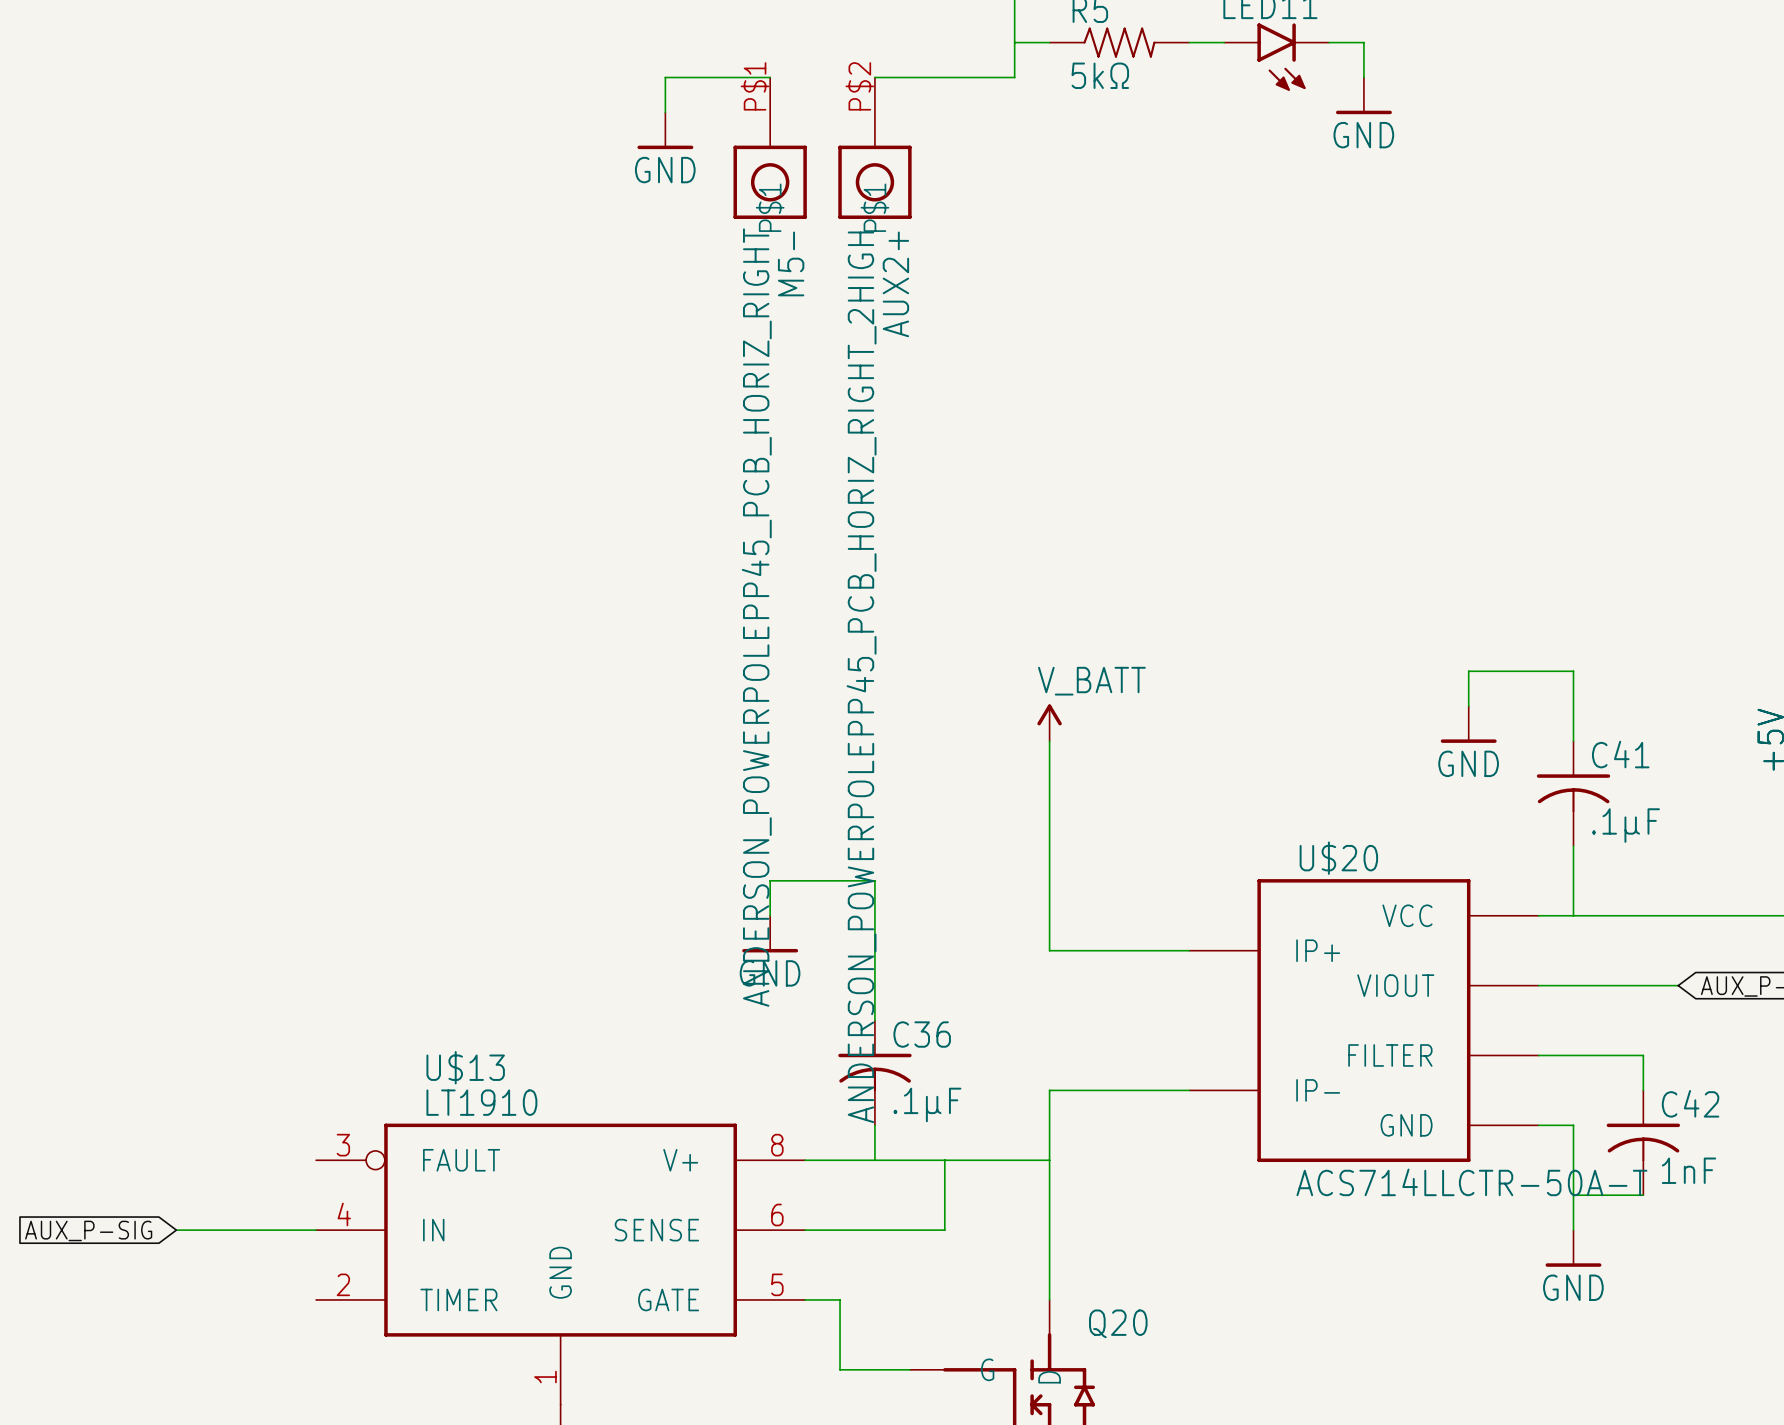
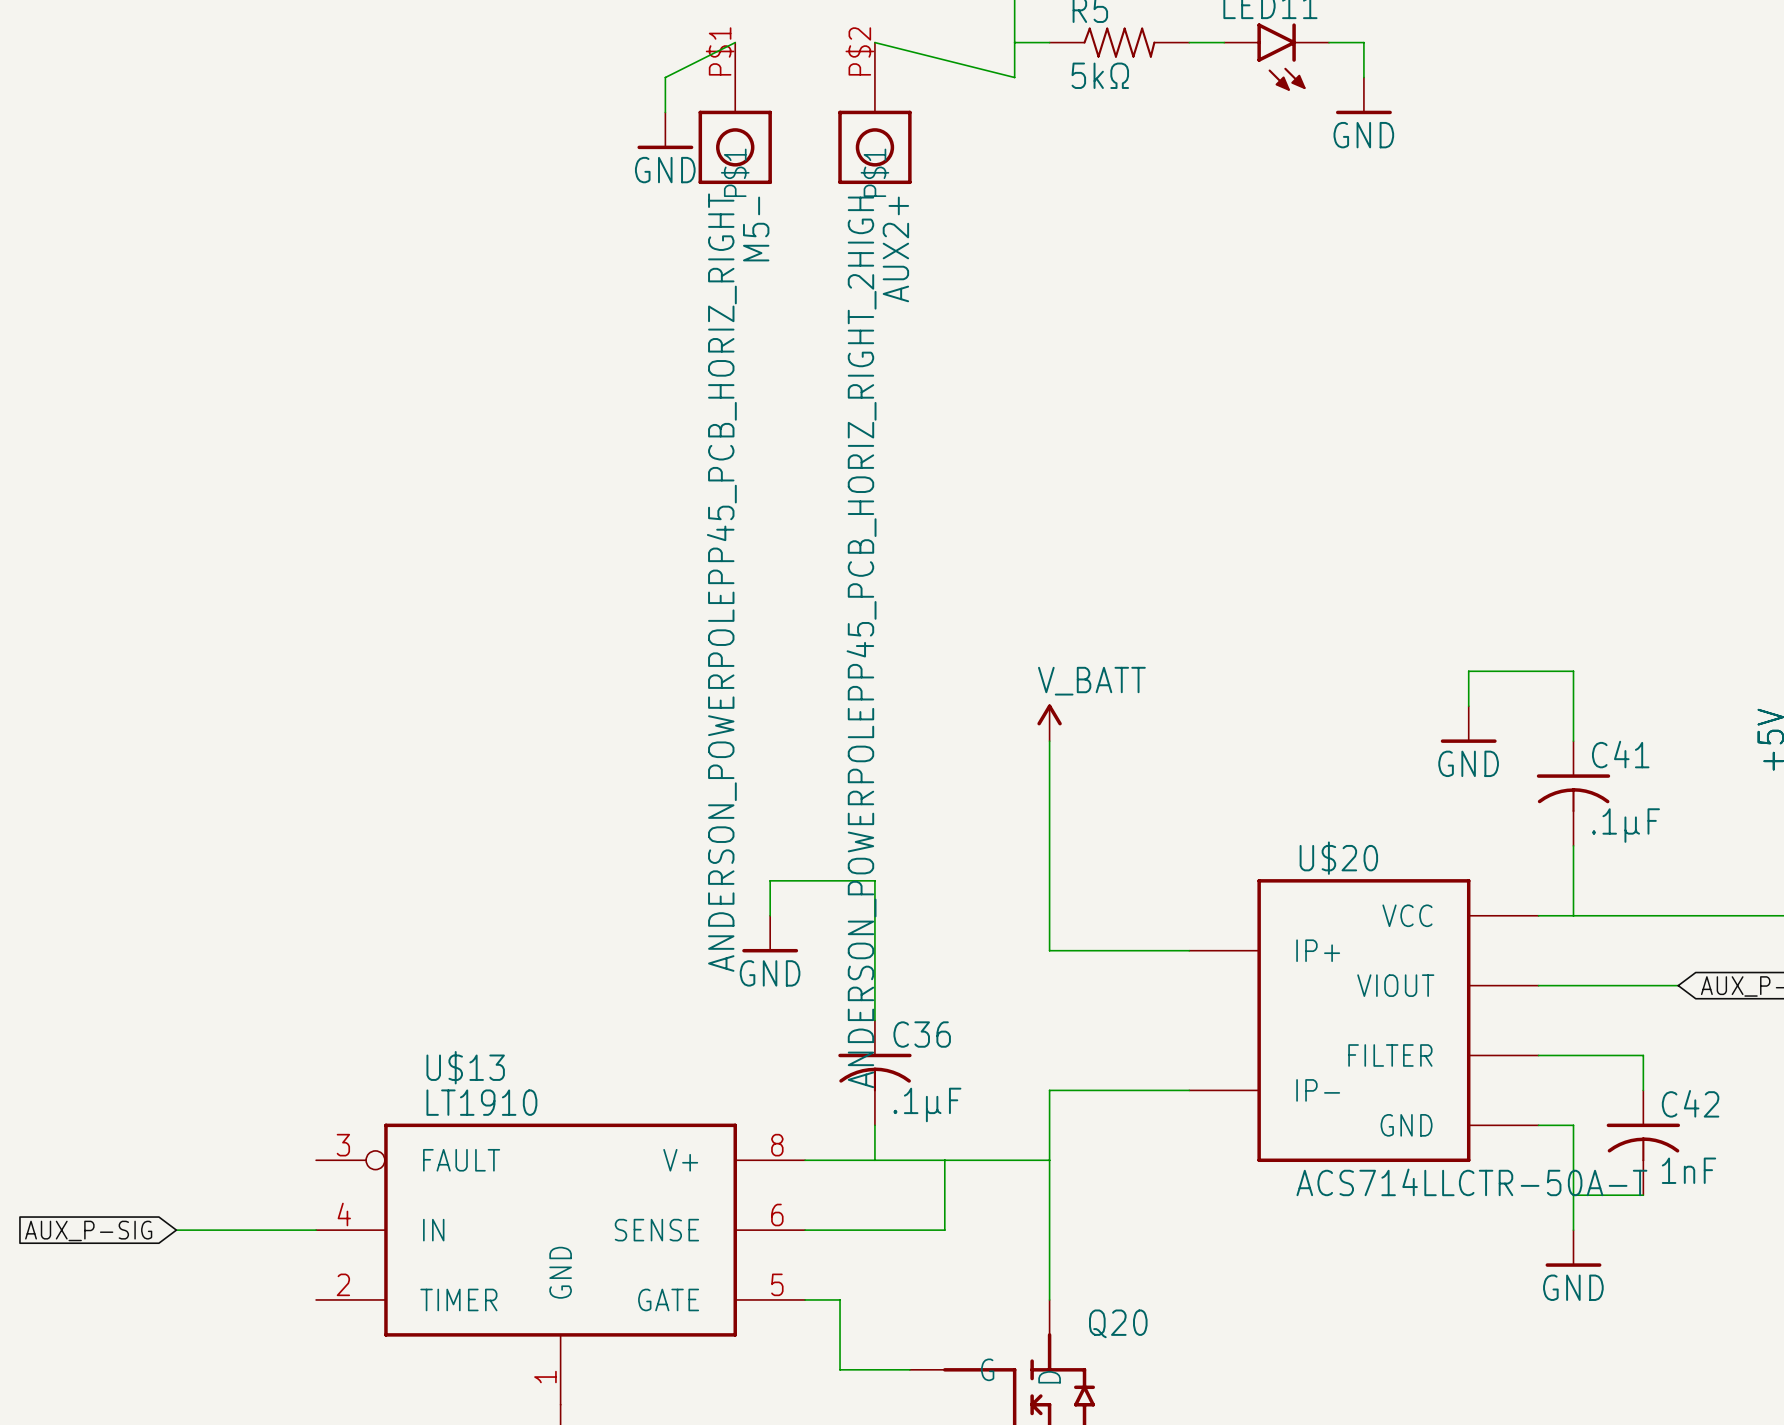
wire: (665, 77) (770, 77) -> (665, 77) (735, 42)
wire: (874, 77) (1014, 77) -> (874, 42) (1014, 77)
M5- position: (770, 148) -> (735, 113)
AUX2+ position: (874, 148) -> (874, 113)

